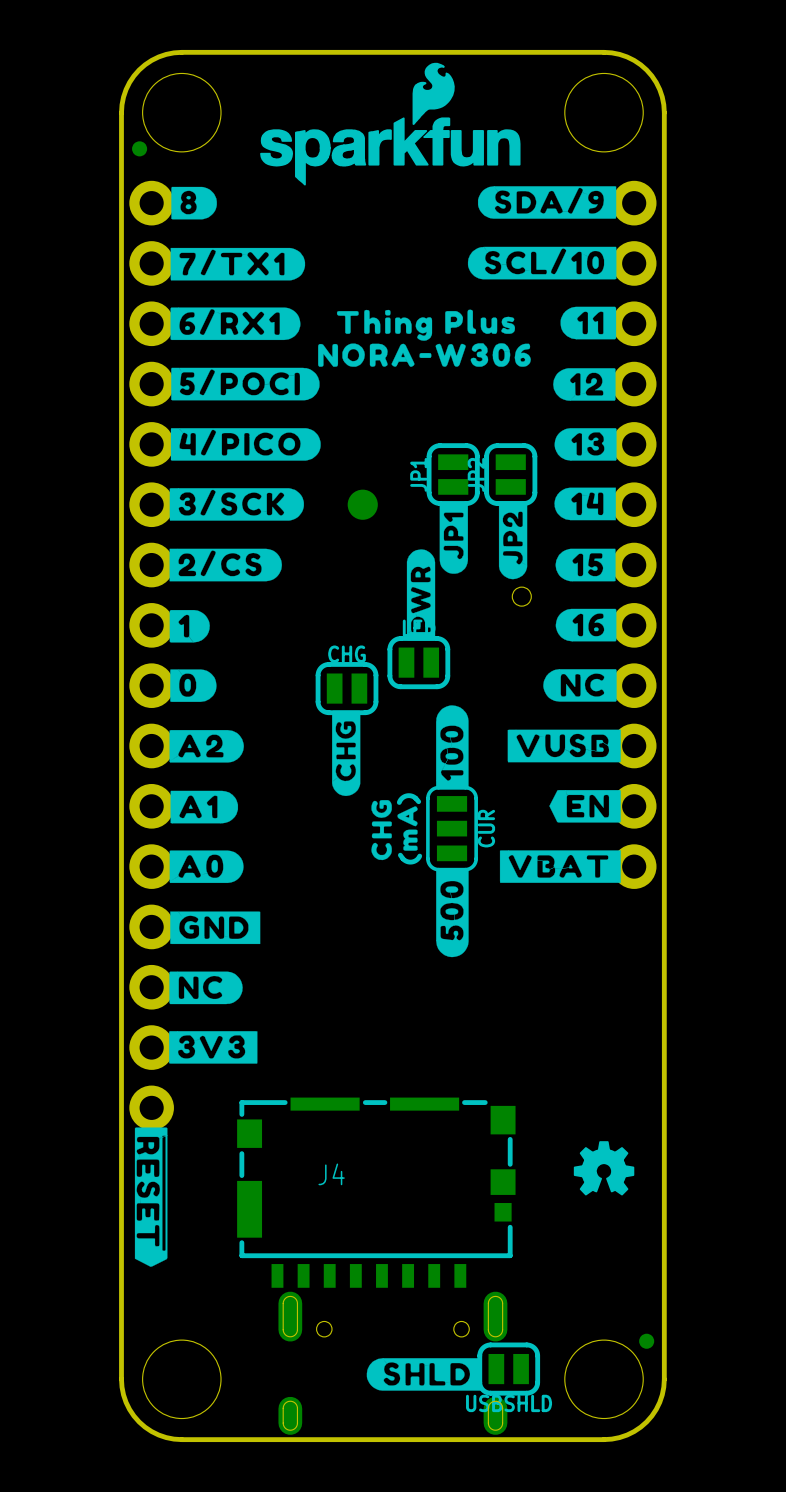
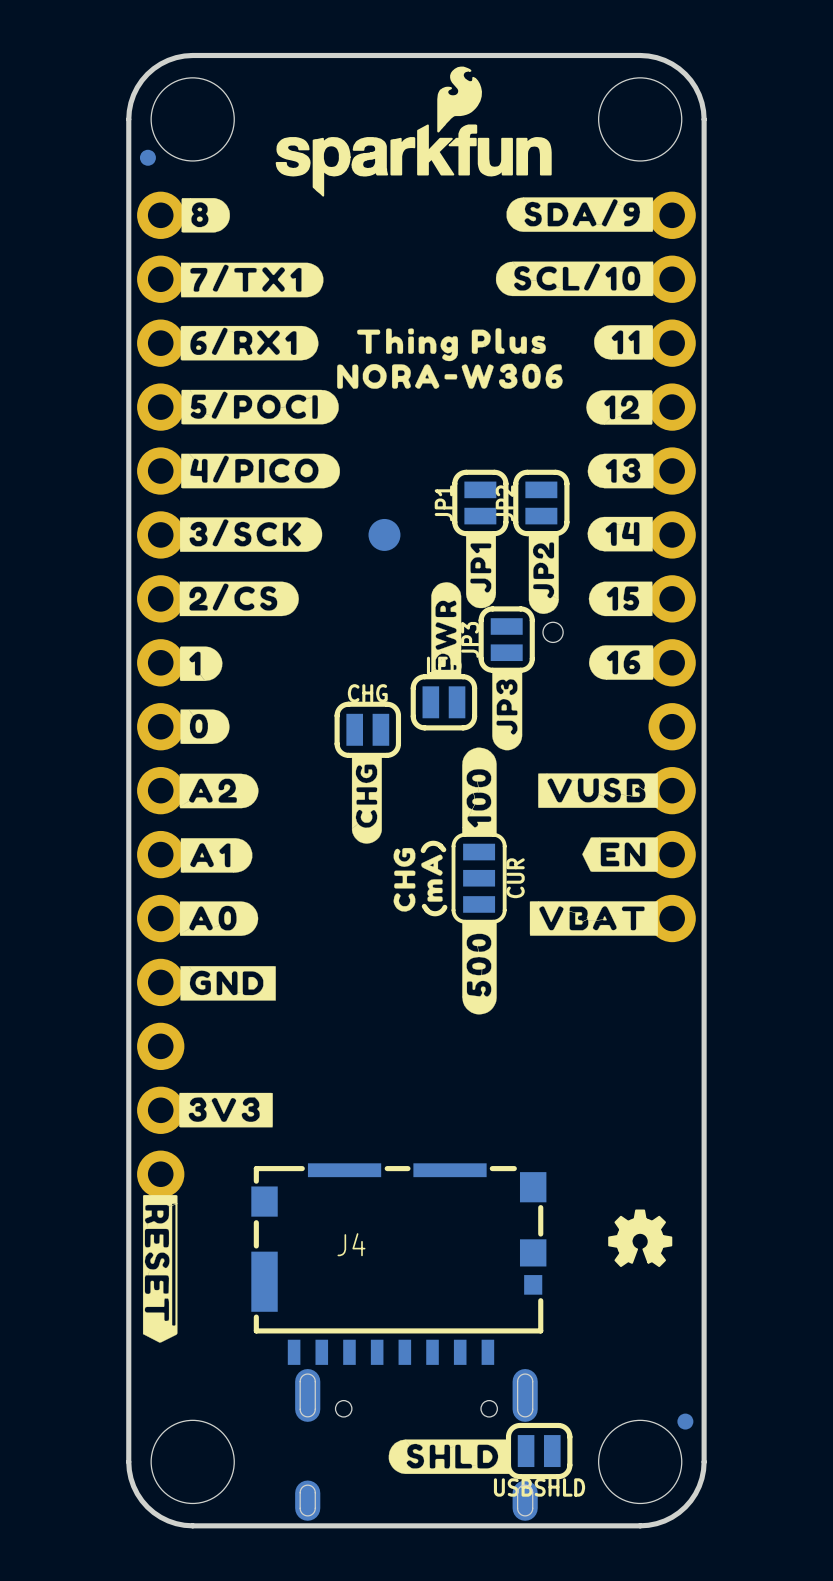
JP3: none -> (506, 639)
drawing: none -> [492, 667, 523, 751]
drawing: [543, 669, 617, 702] -> none
drawing: [169, 971, 243, 1005] -> none

